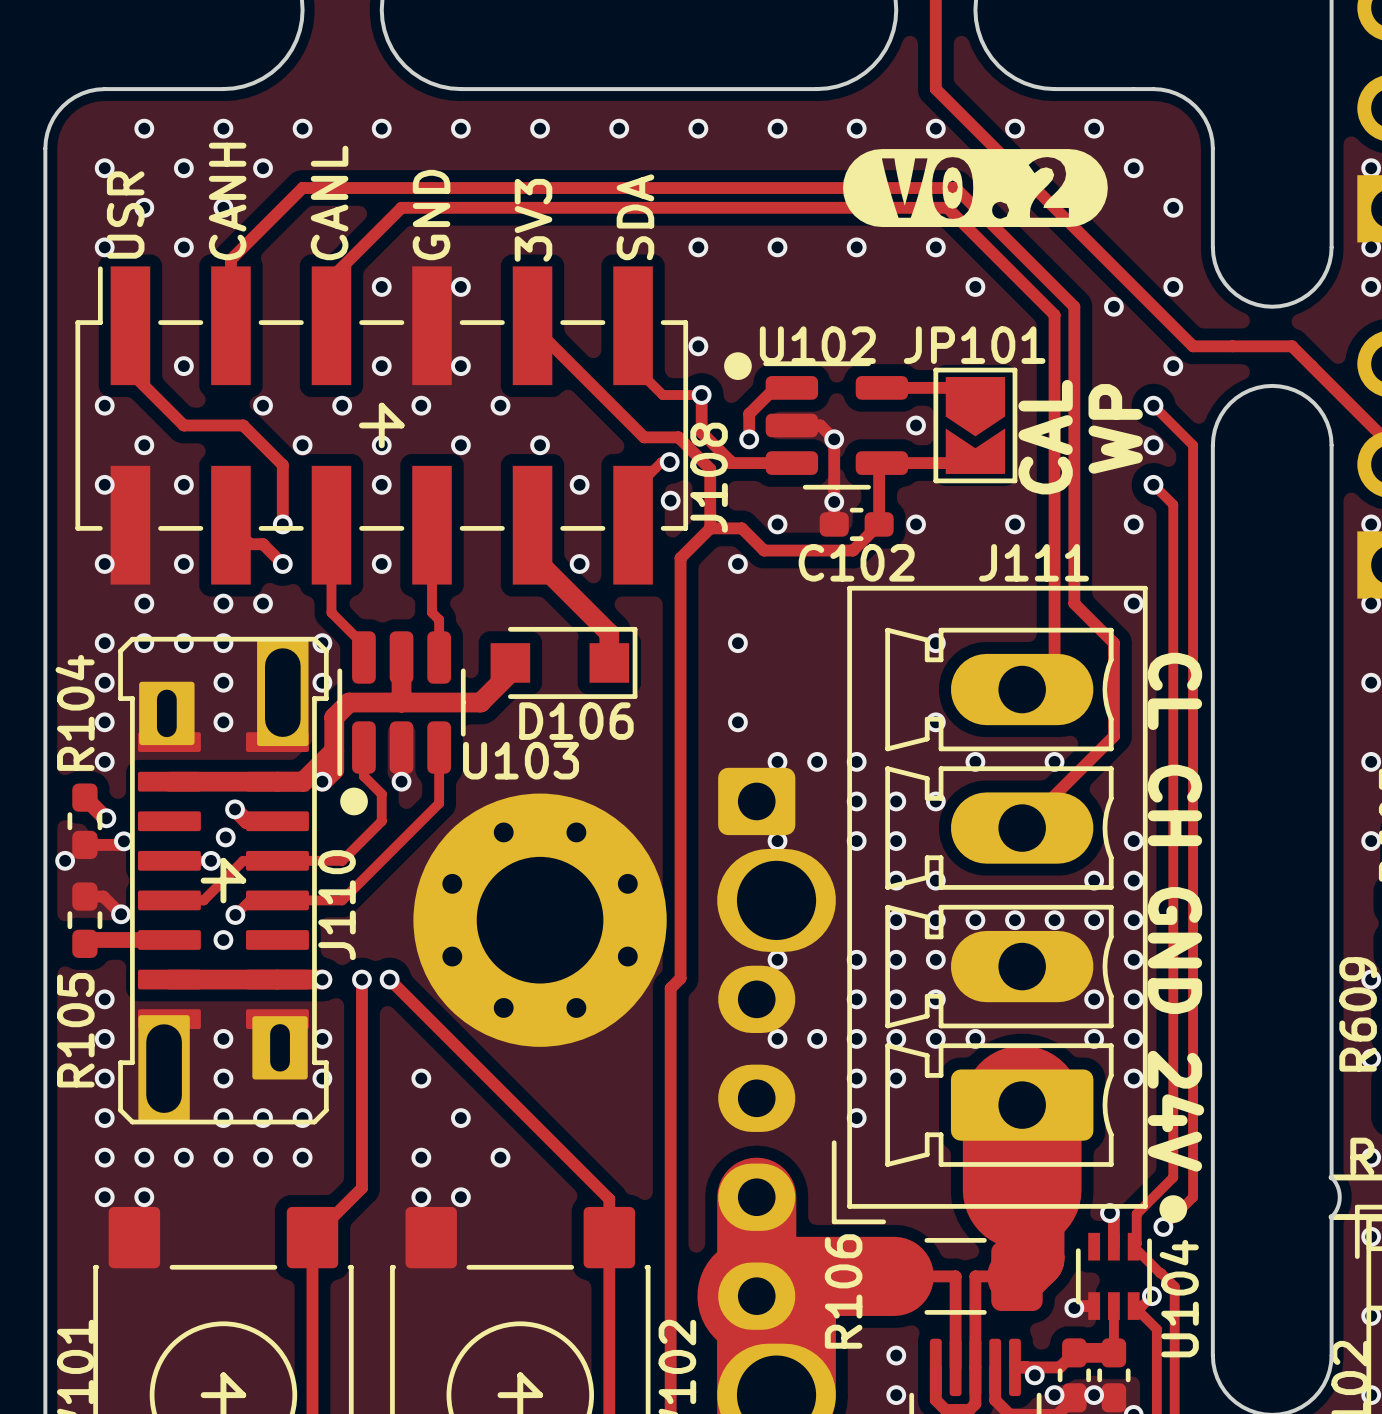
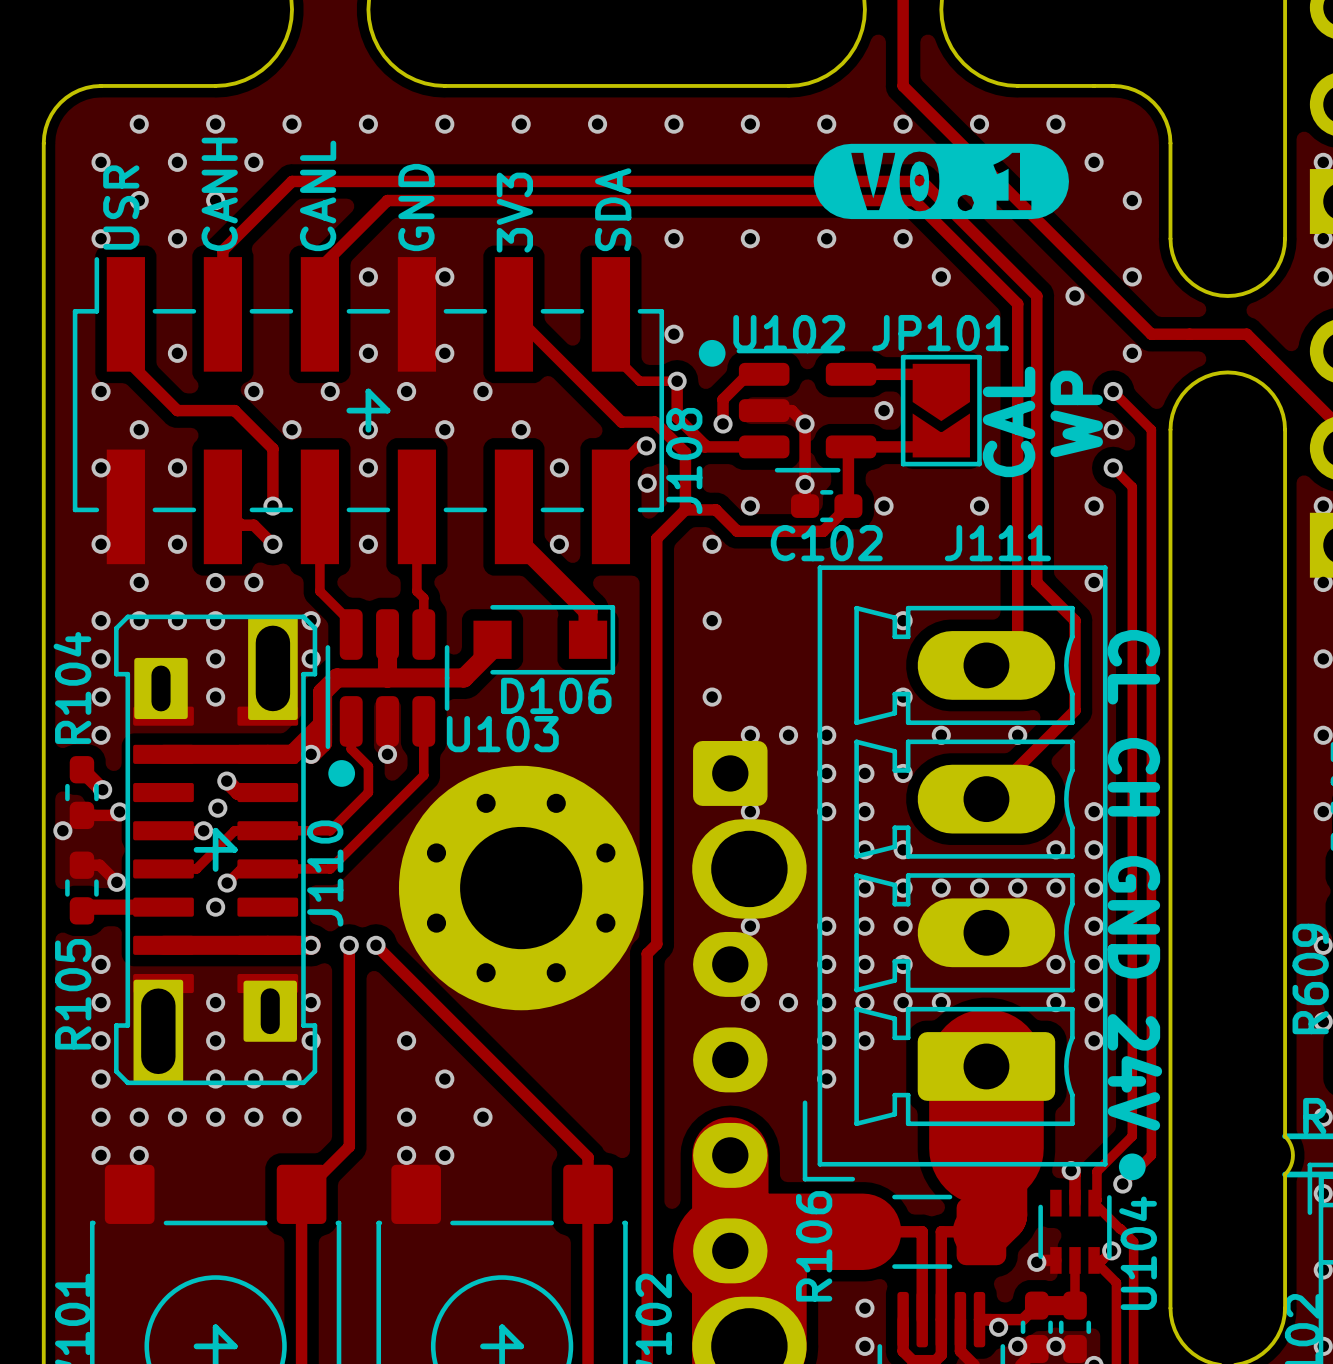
drawing shape: [842, 149, 1108, 227] -> [813, 143, 1069, 220]

